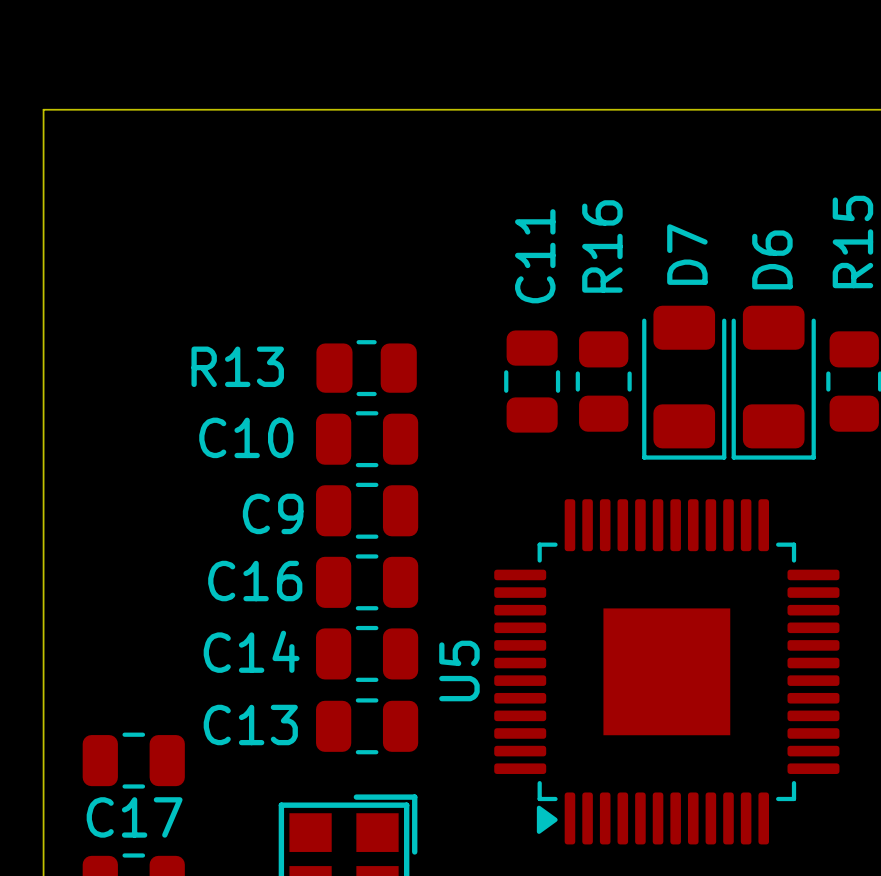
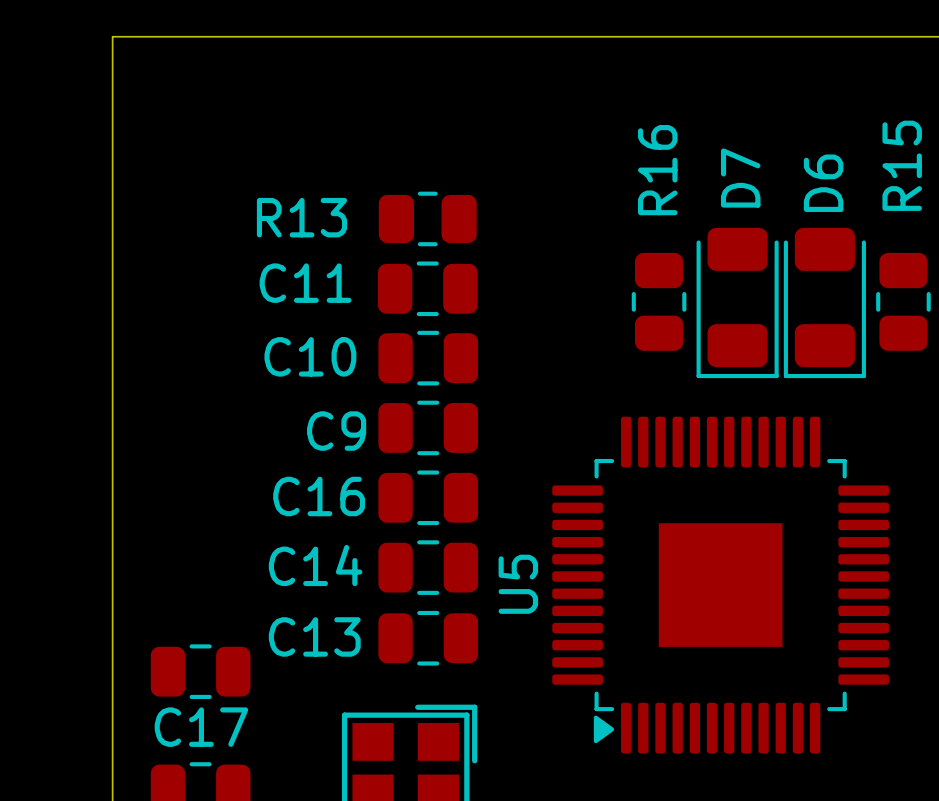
C11 name position: C11 (535, 256) -> C11 (305, 283)
R13 position: (366, 368) -> (427, 218)
C11 rotation: 0° (532, 381) -> 90° clockwise (427, 288)
C11 position: (532, 381) -> (427, 288)

